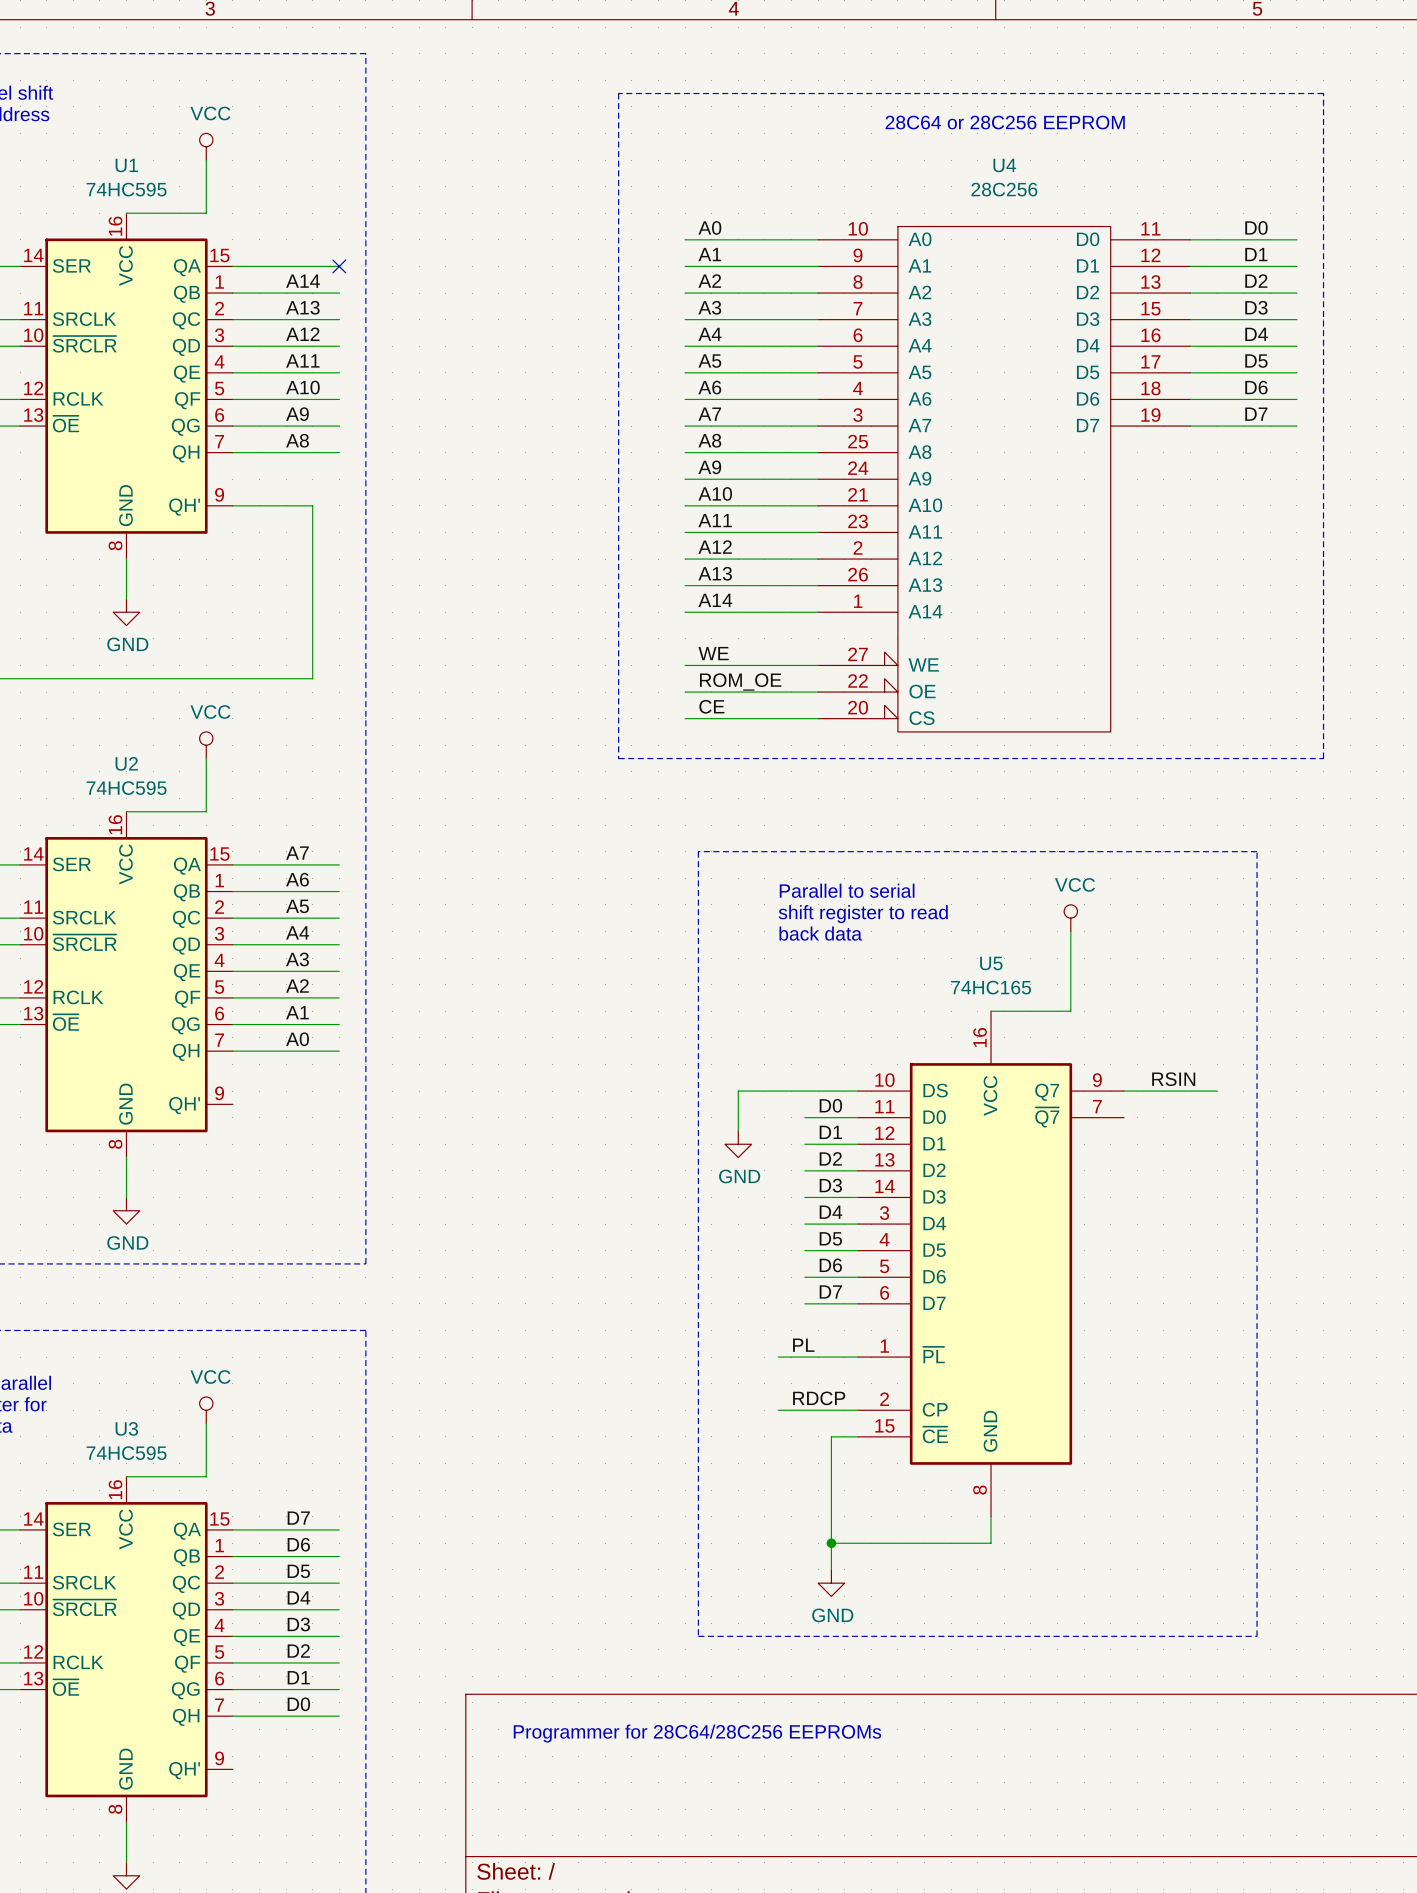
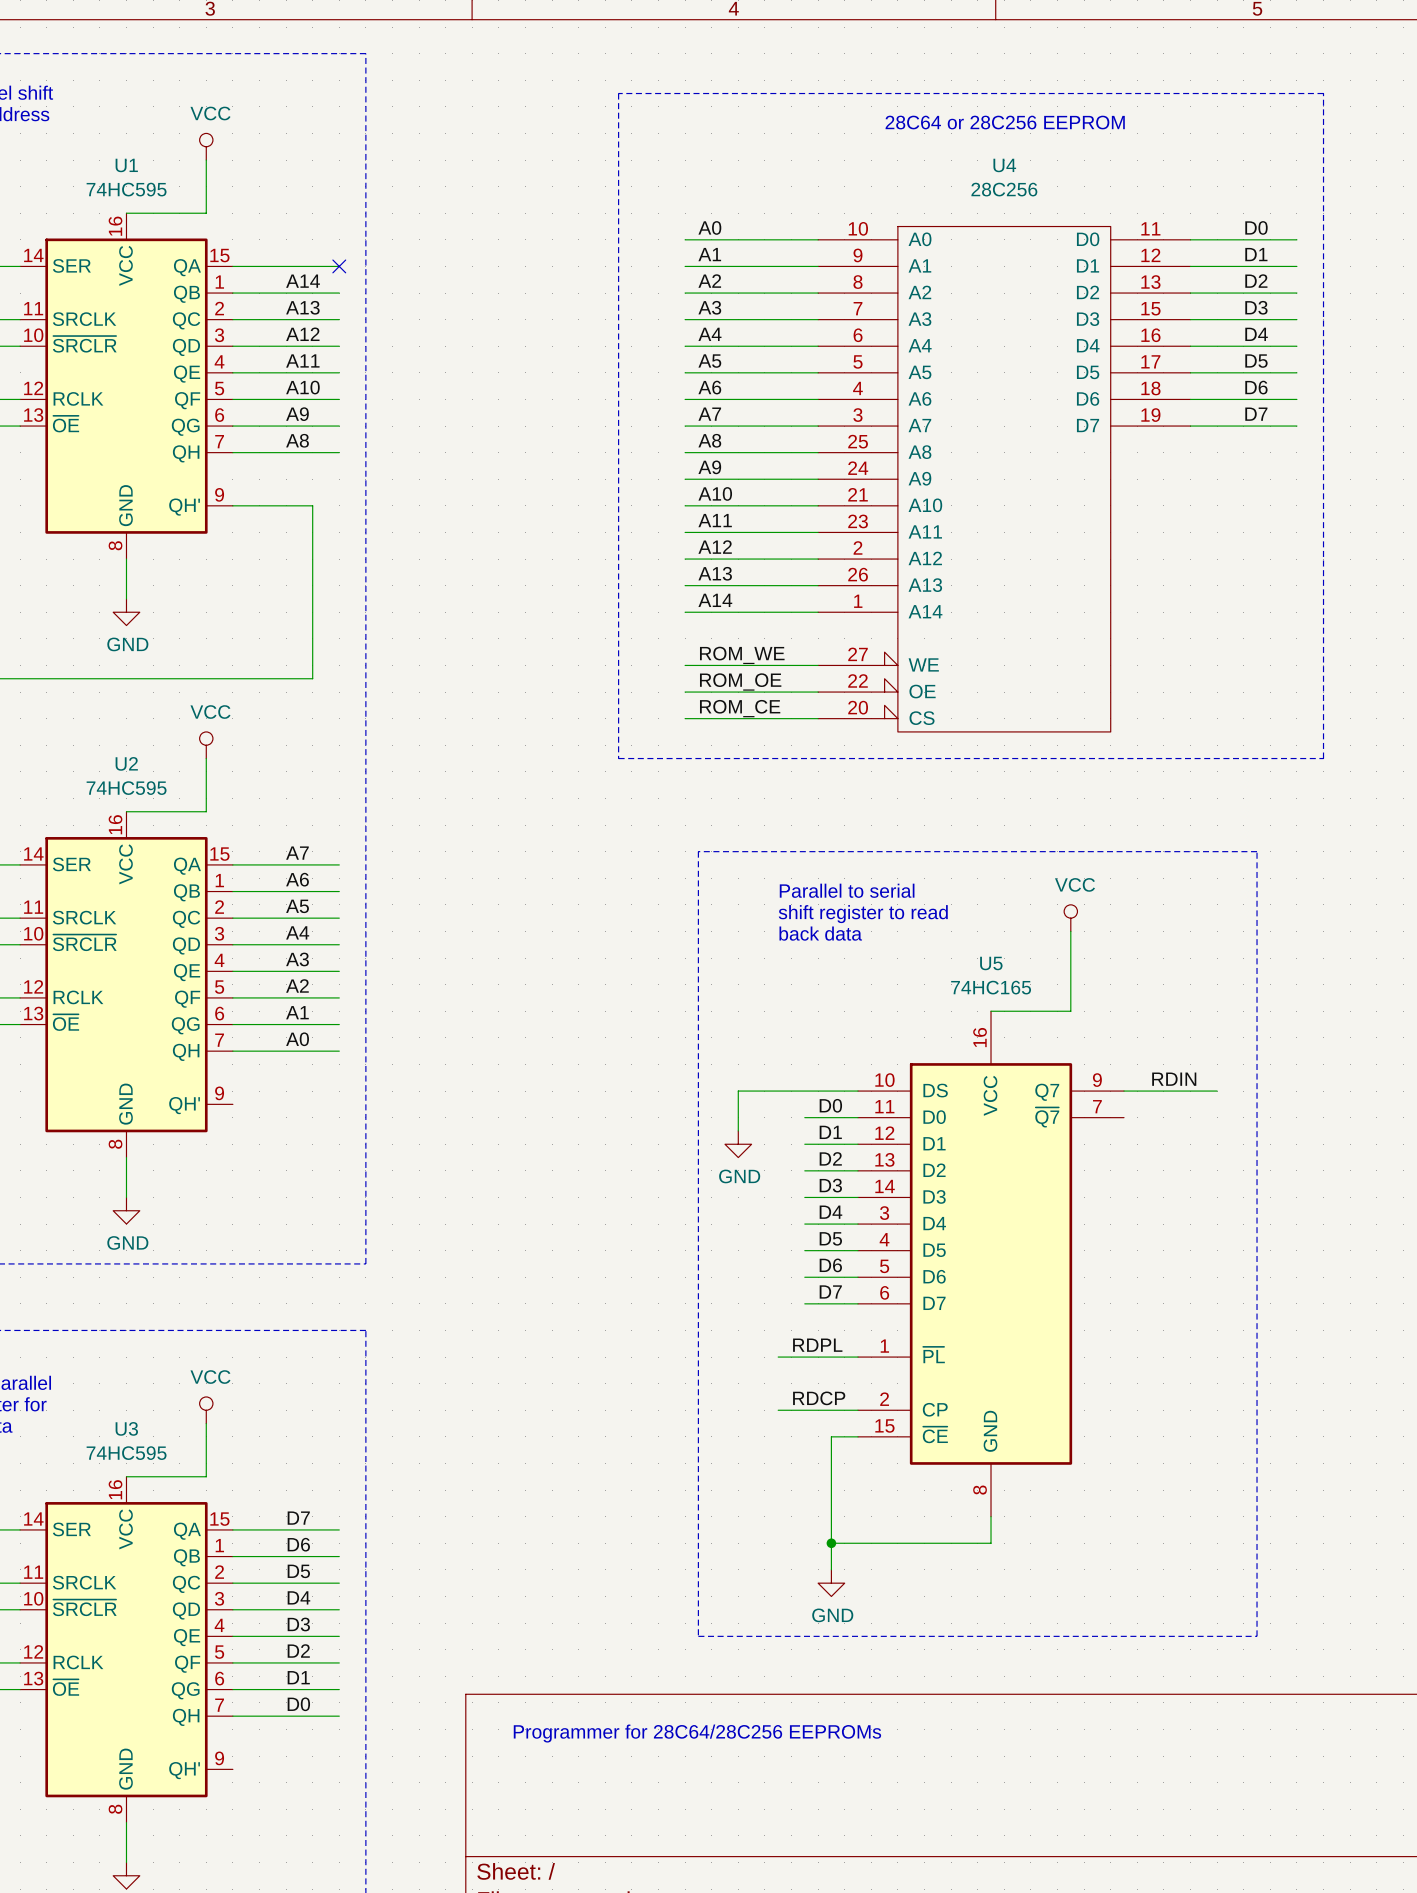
label: WE (713, 653) -> ROM_WE (742, 655)
label: CE (711, 706) -> ROM_CE (740, 708)
label: RSIN (1173, 1079) -> RDIN (1174, 1079)
label: PL (803, 1345) -> RDPL (817, 1345)

